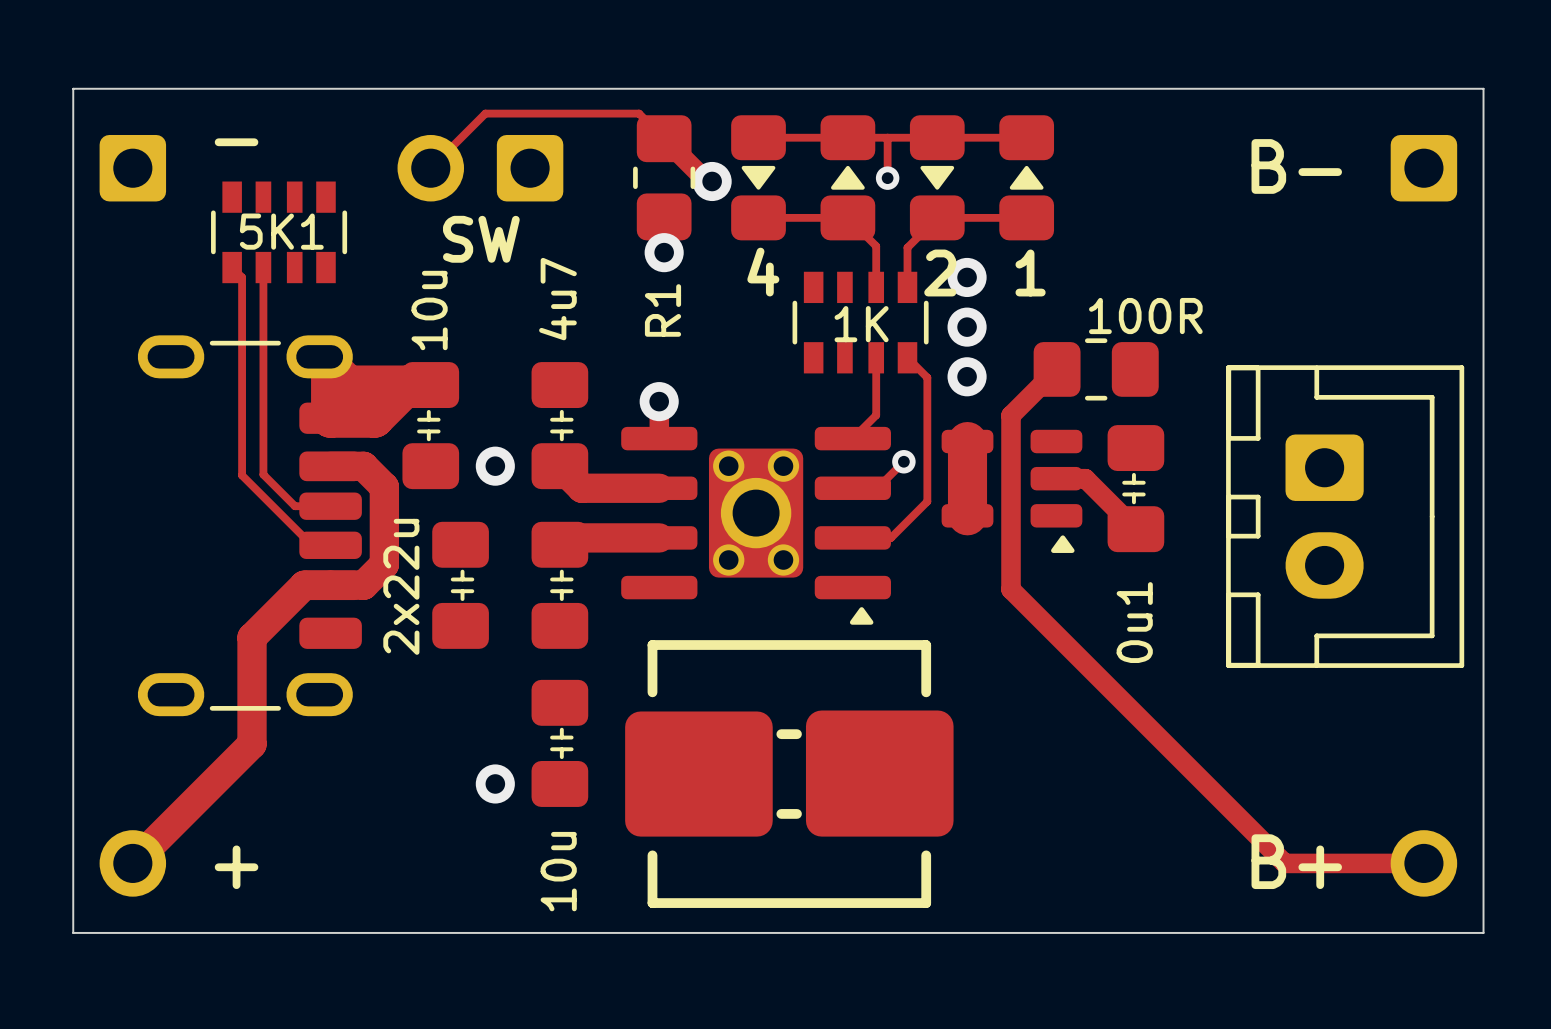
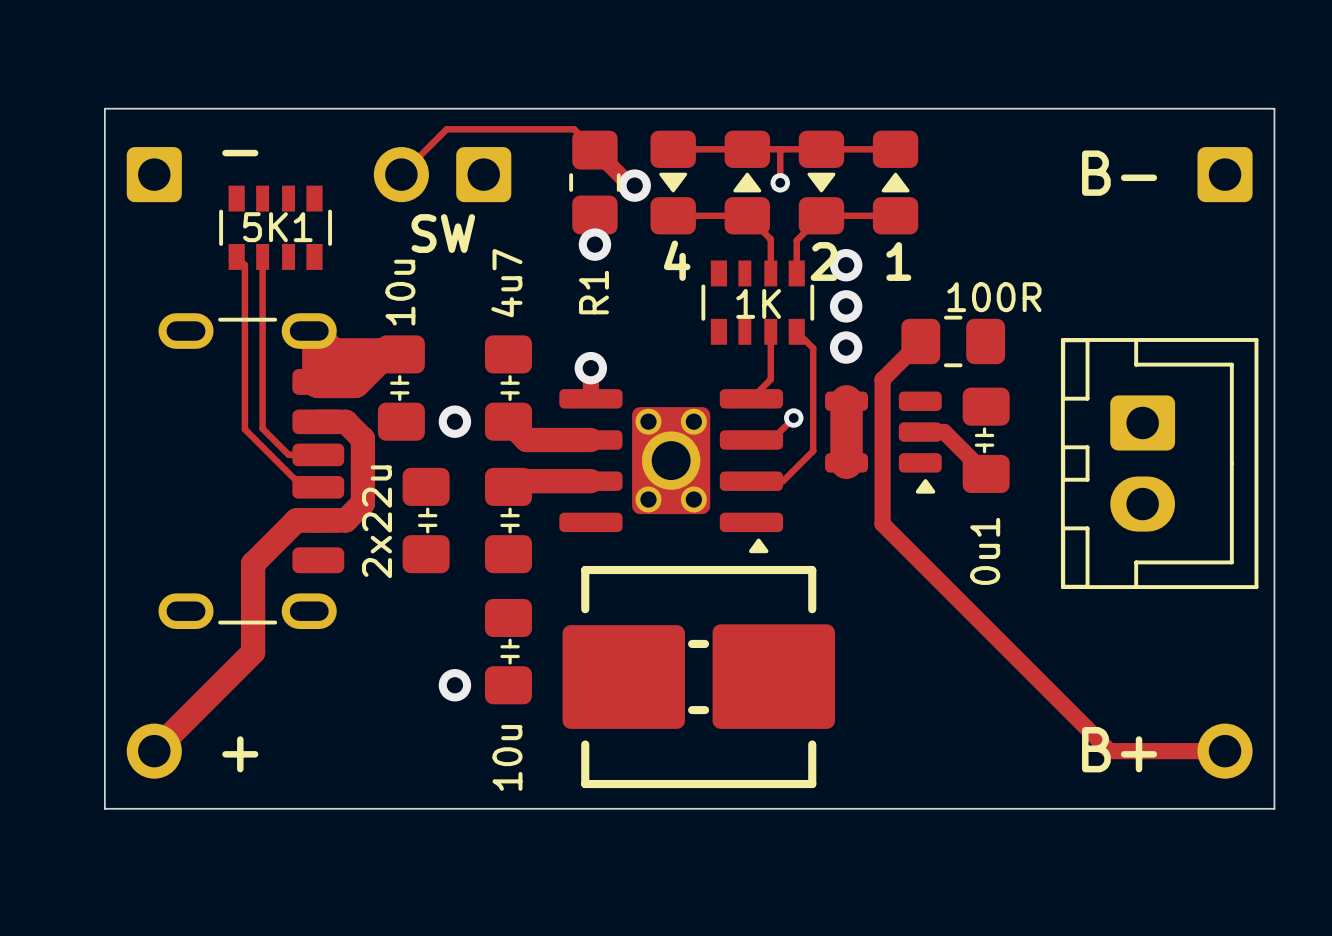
part footprint: [625, 640, 954, 908] -> [562, 565, 835, 789]

